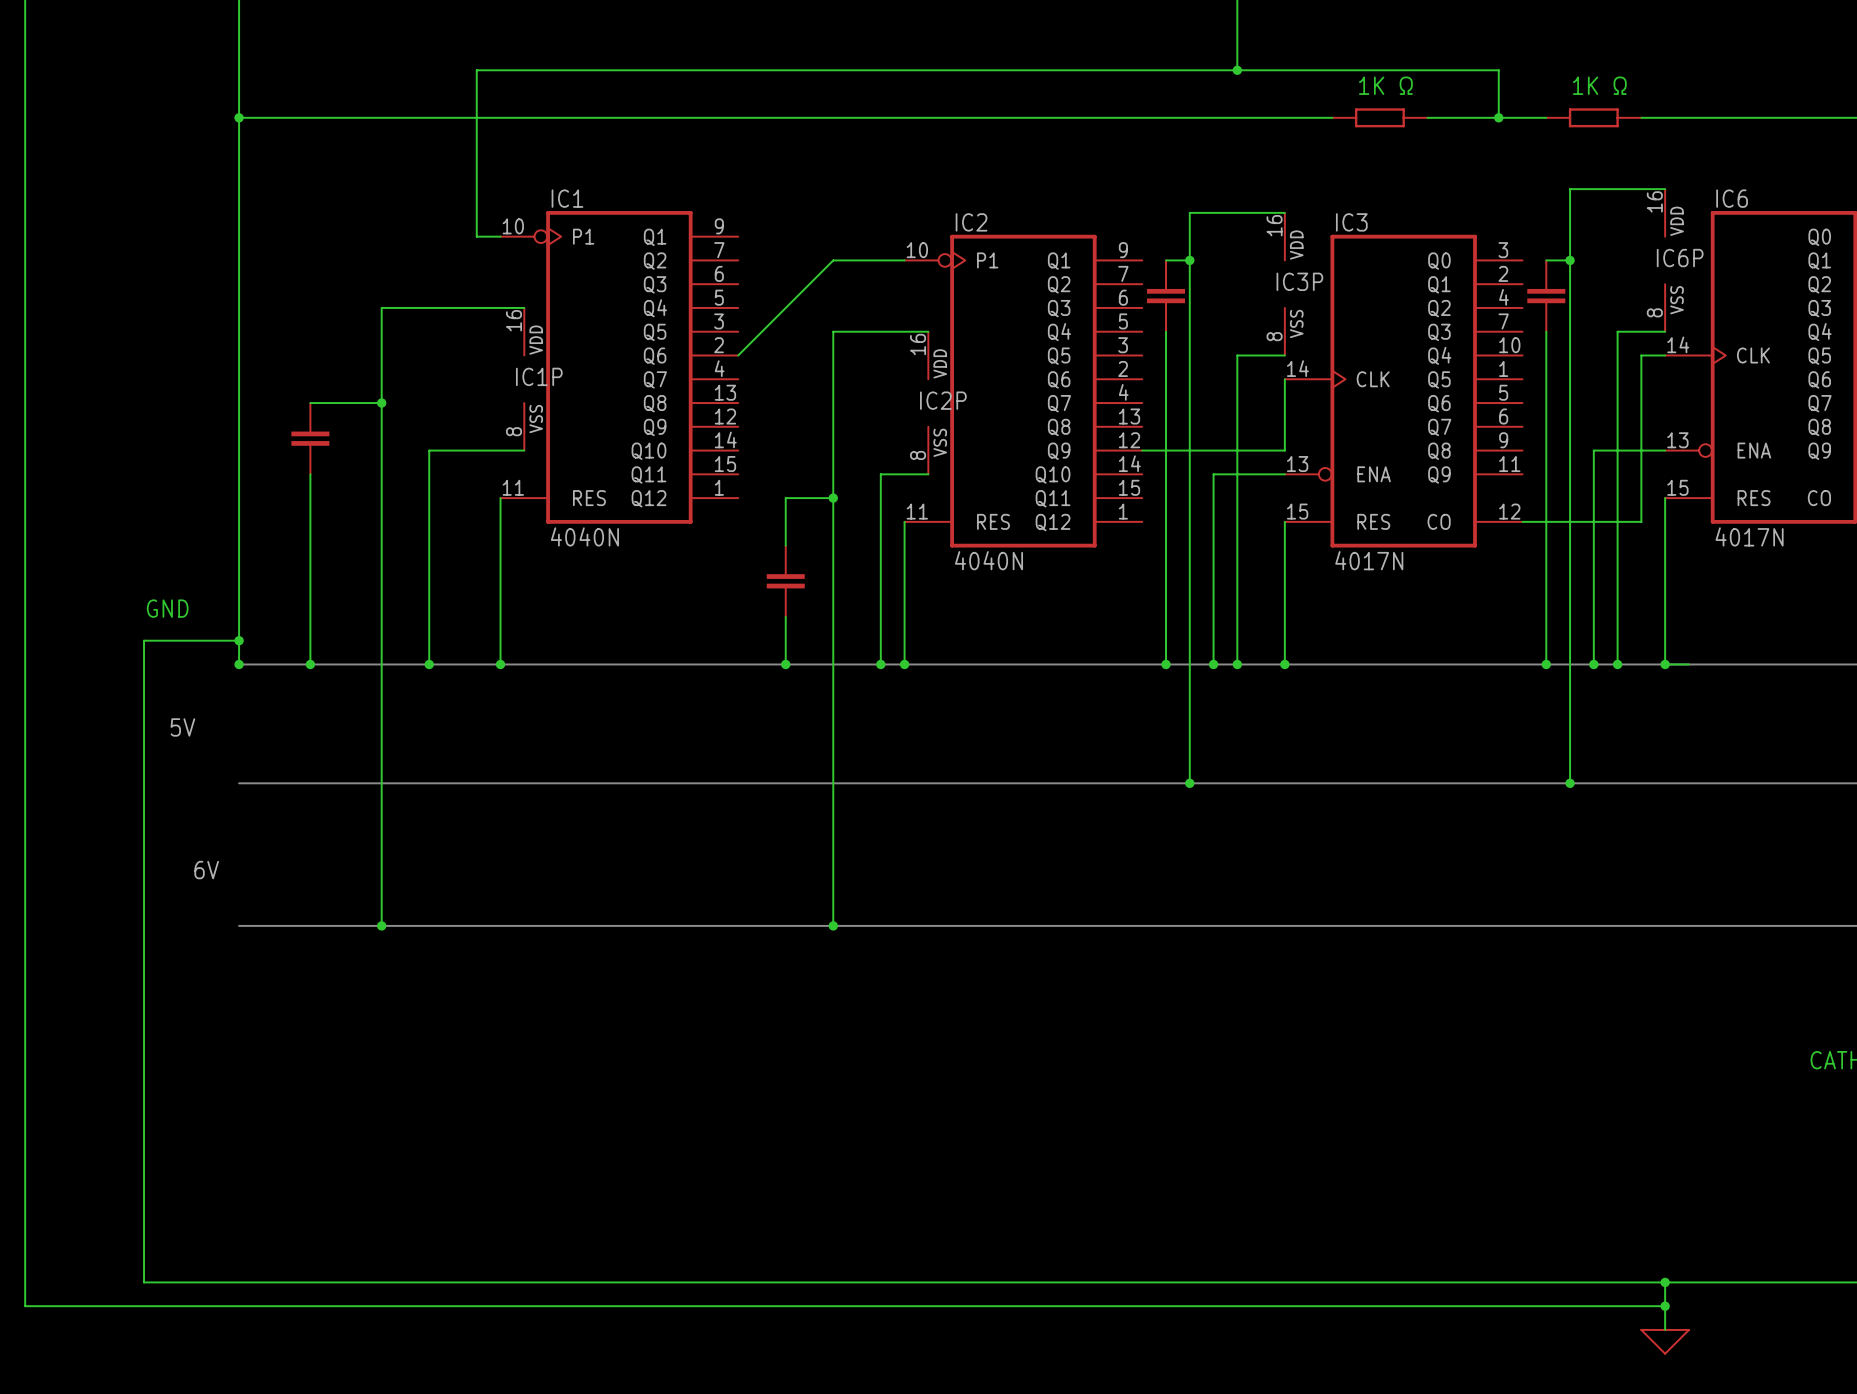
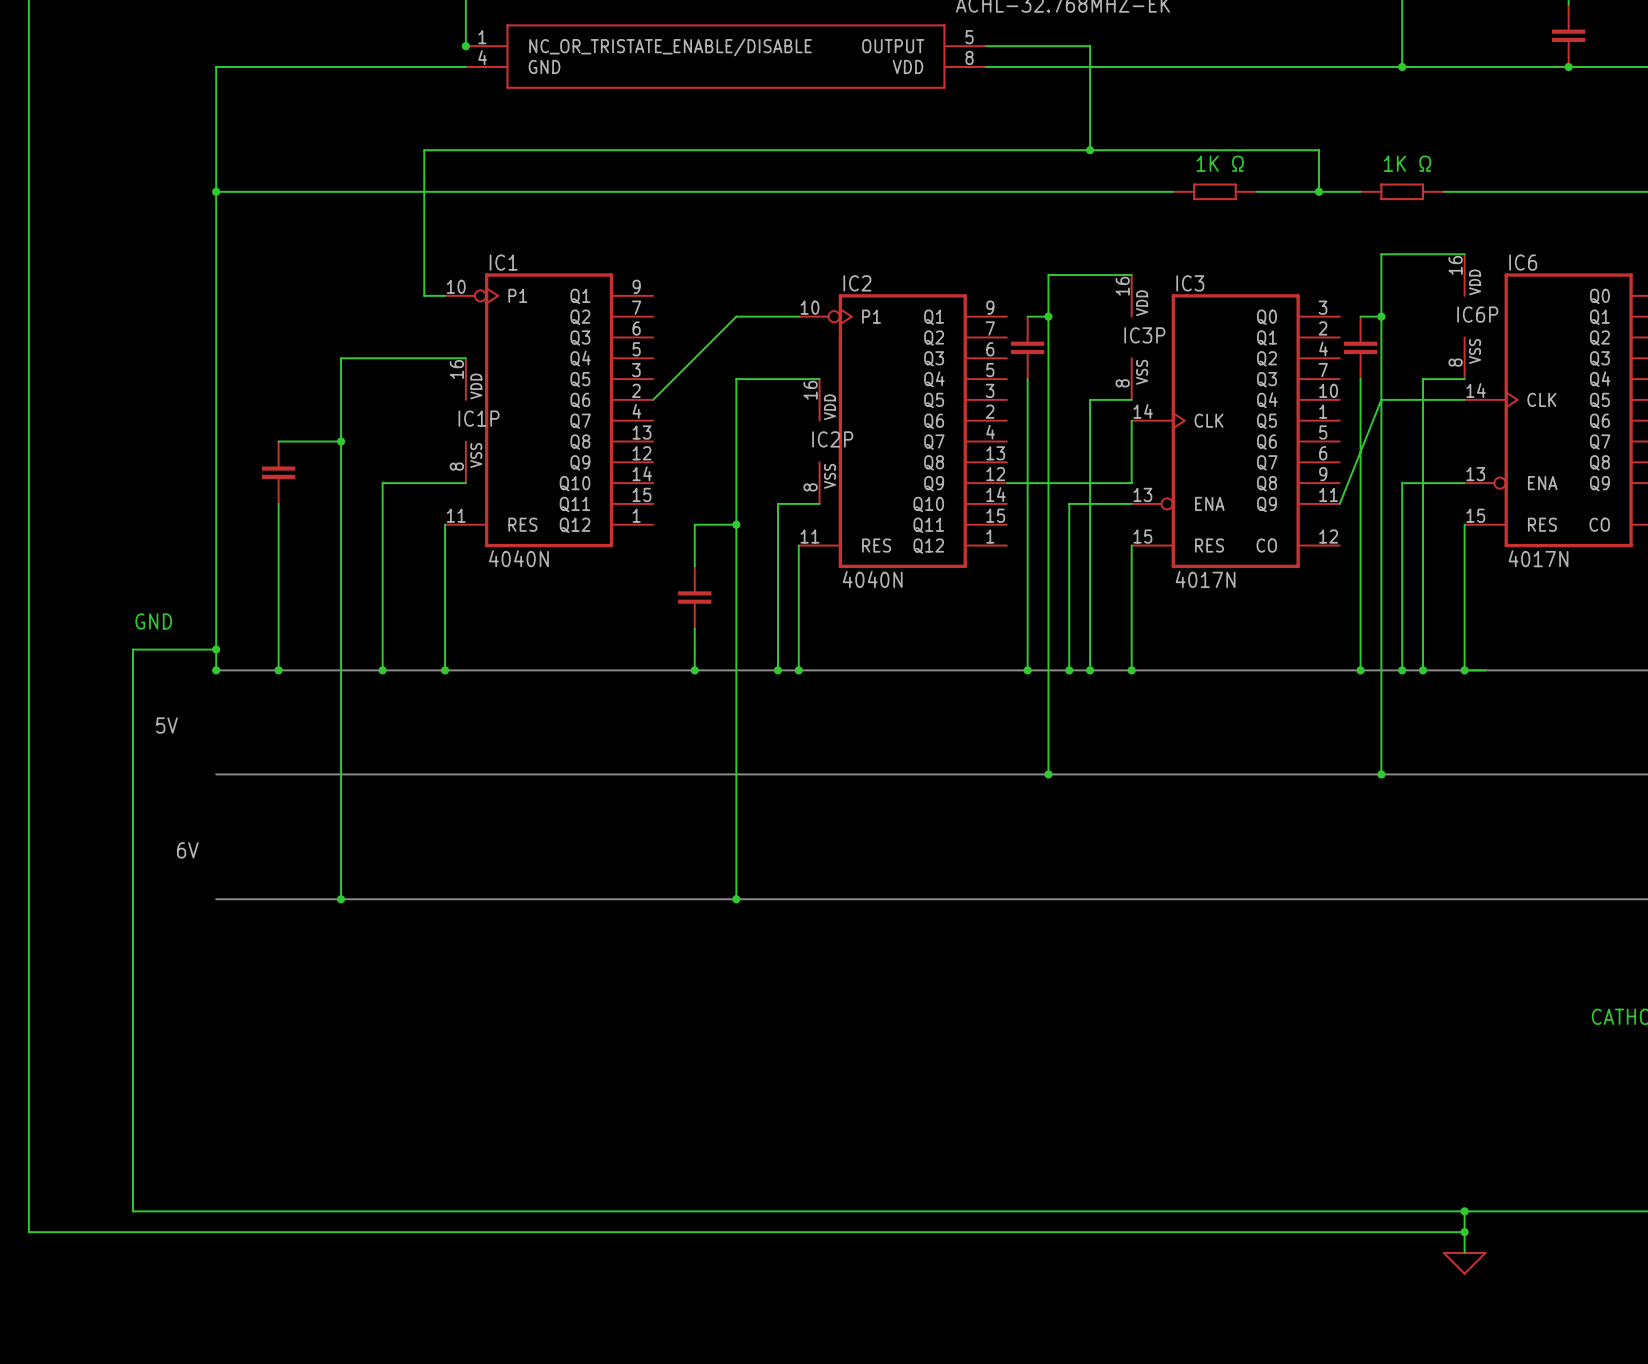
wire: (1641, 355) (1641, 521) (1522, 521) -> (1443, 399) (1381, 399) (1339, 503)

